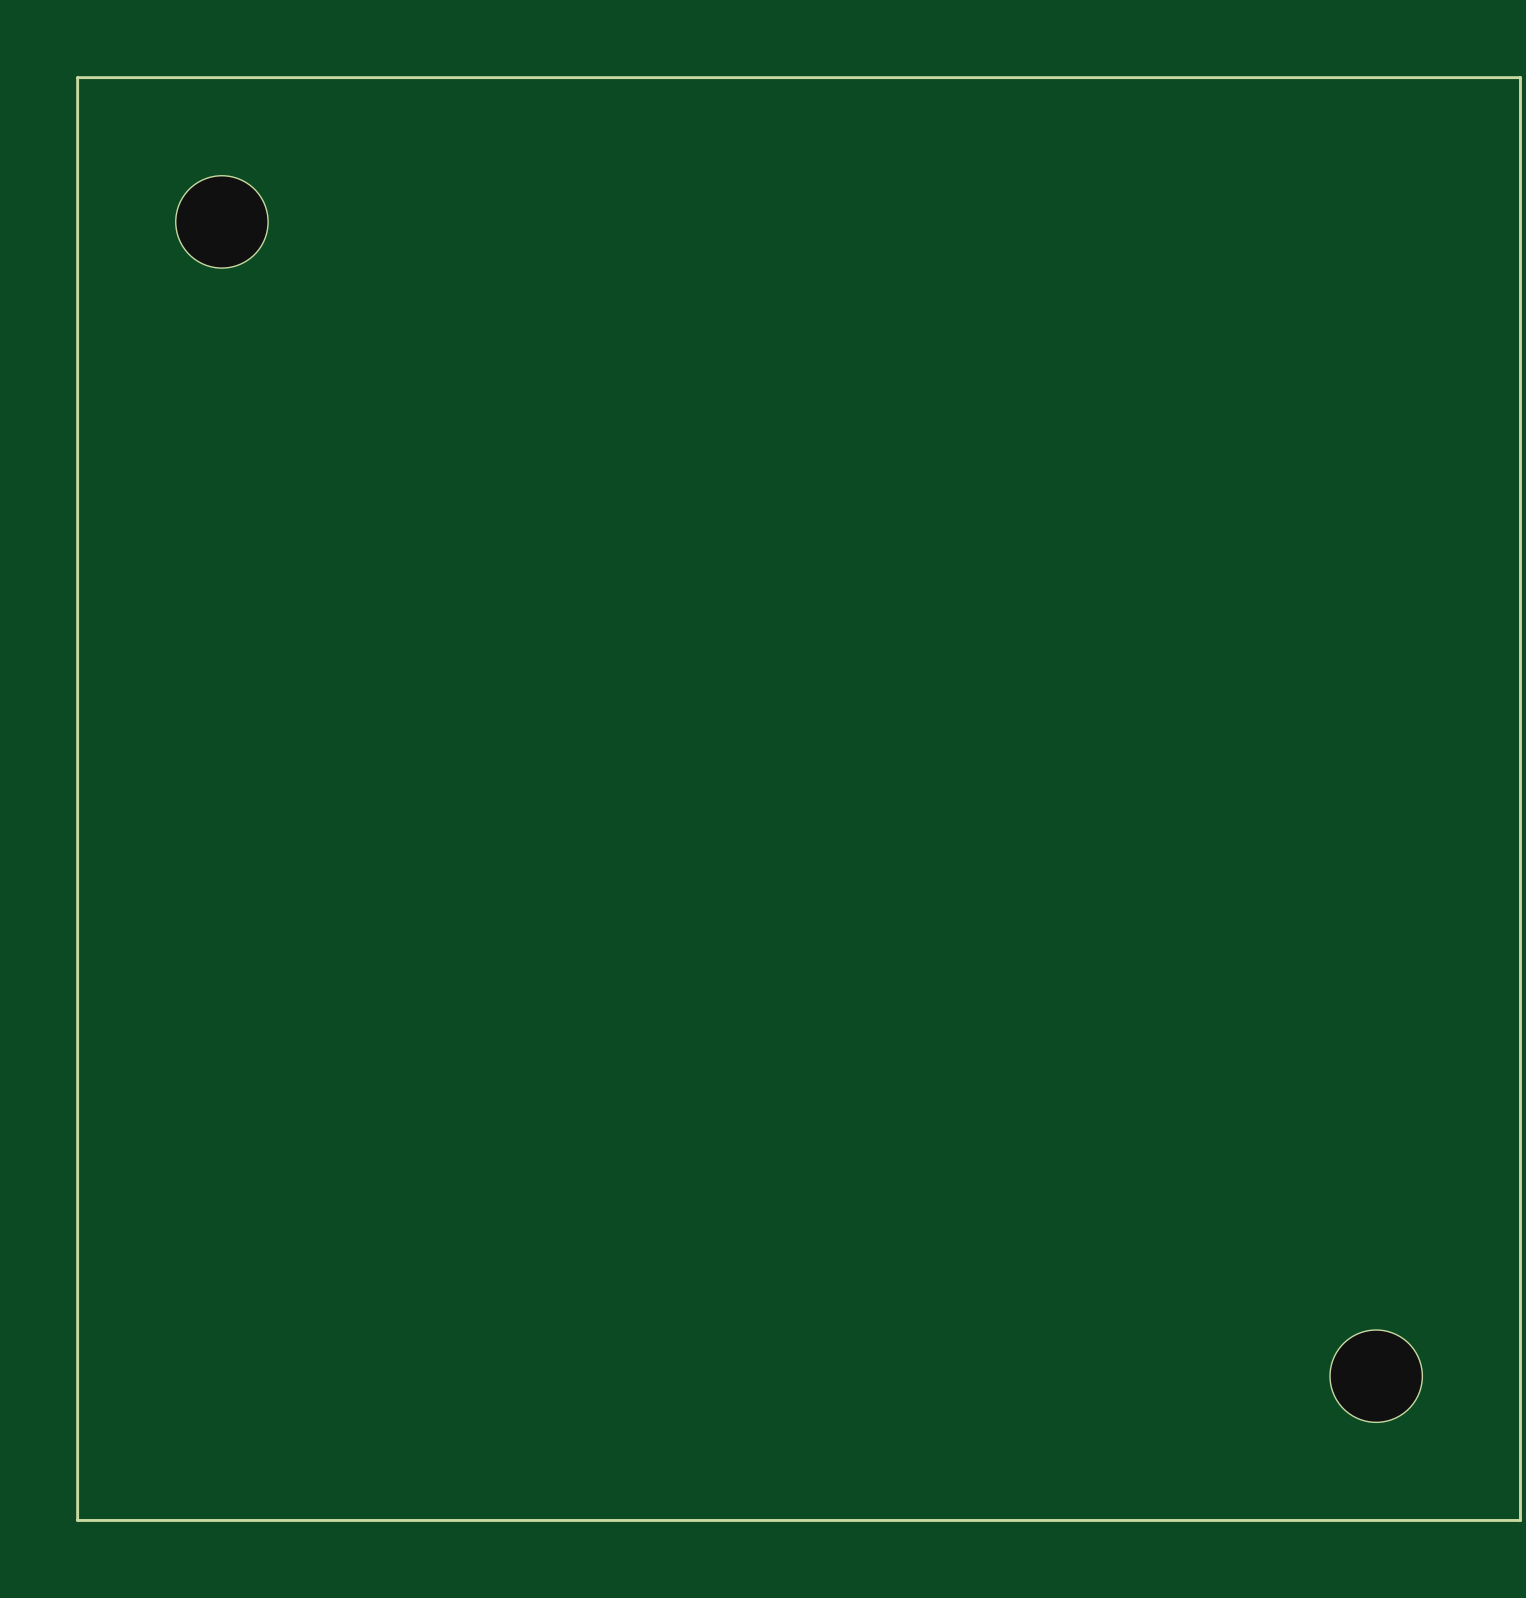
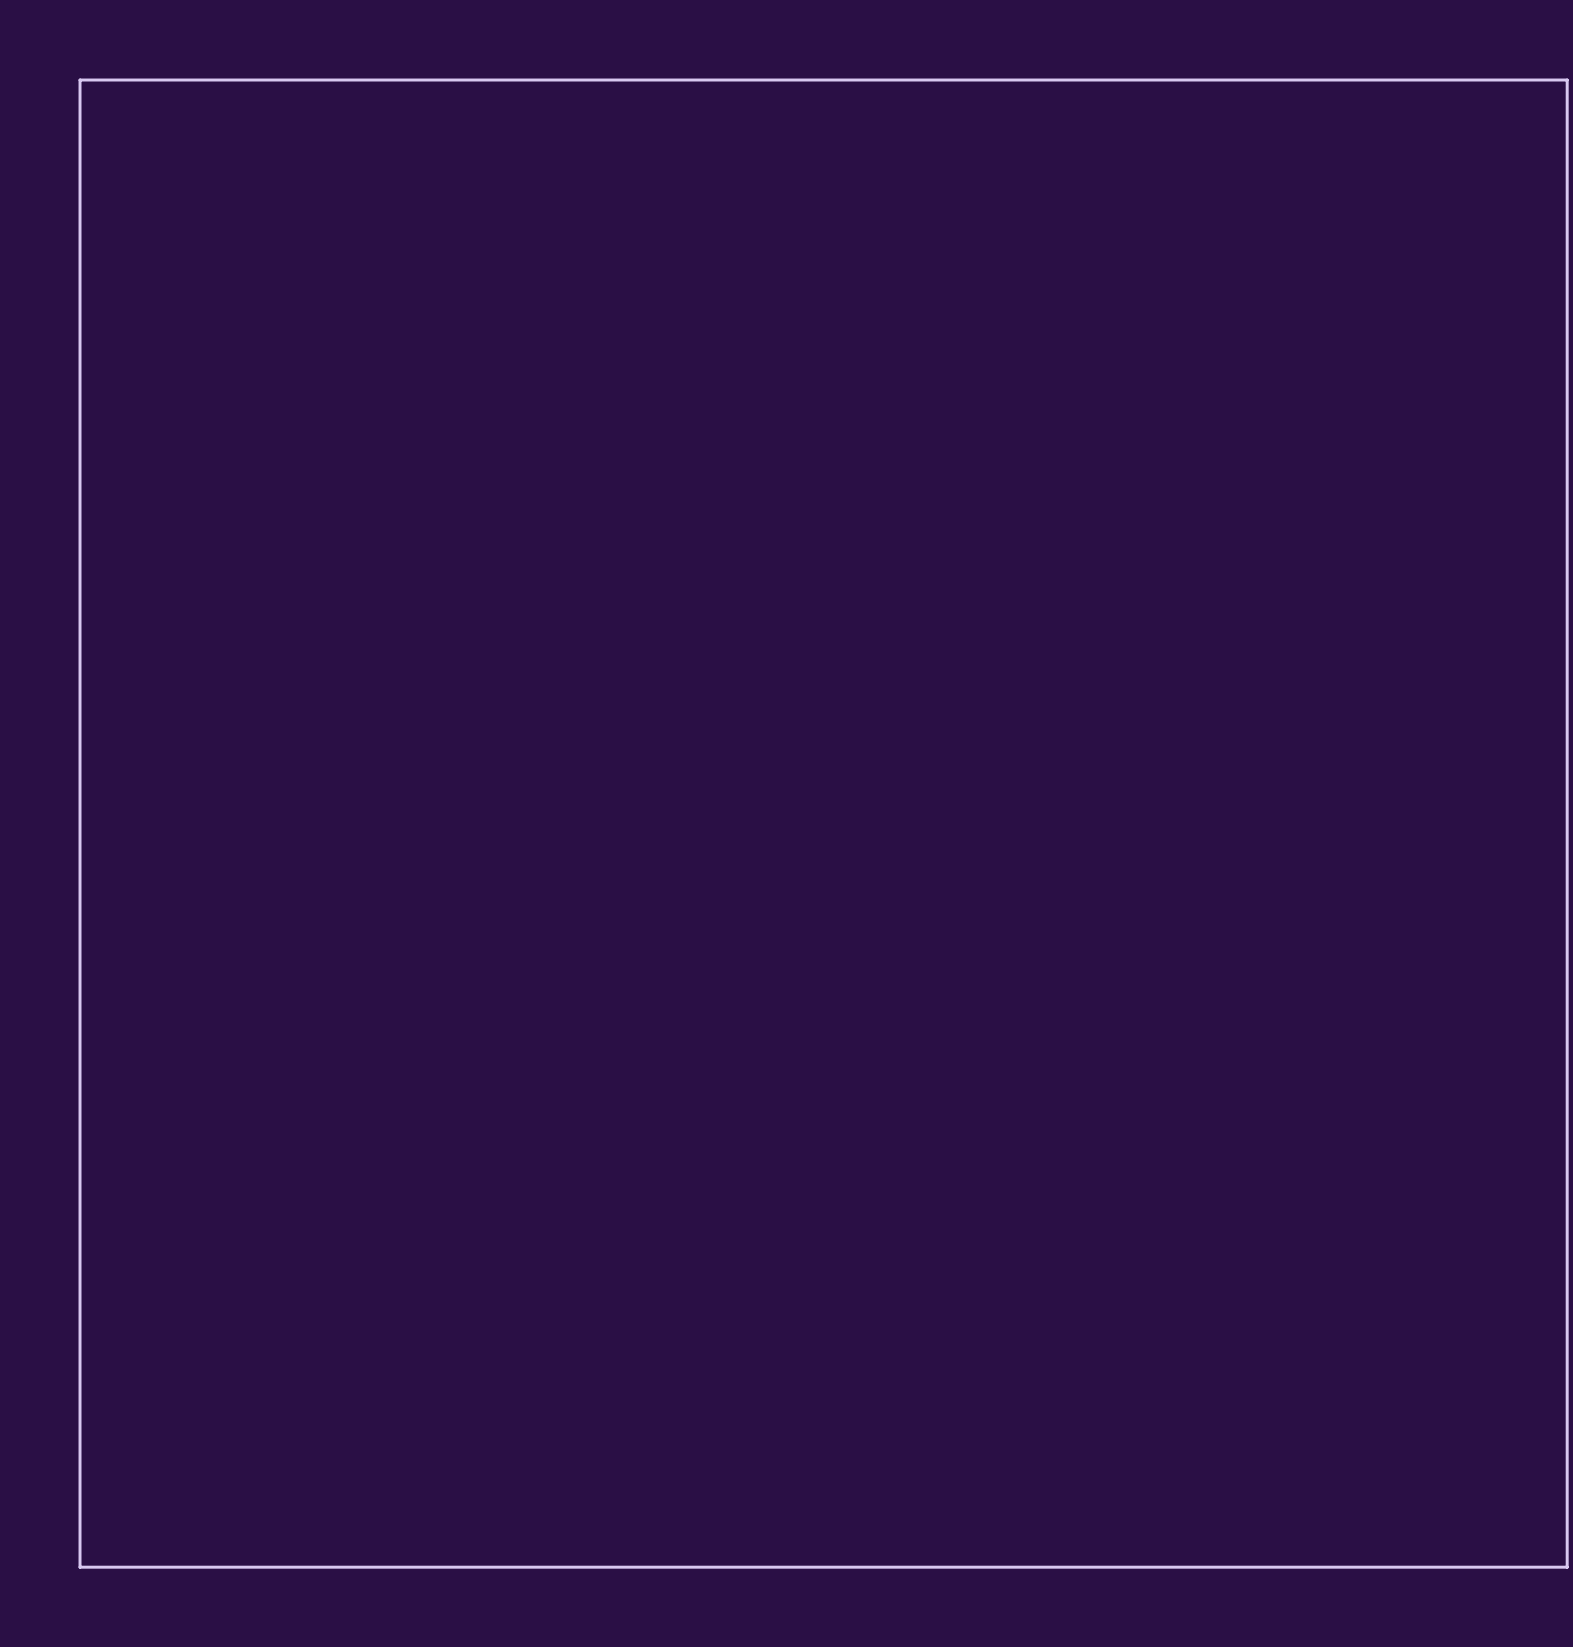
part: (221, 221) -> none
part: (1376, 1376) -> none

